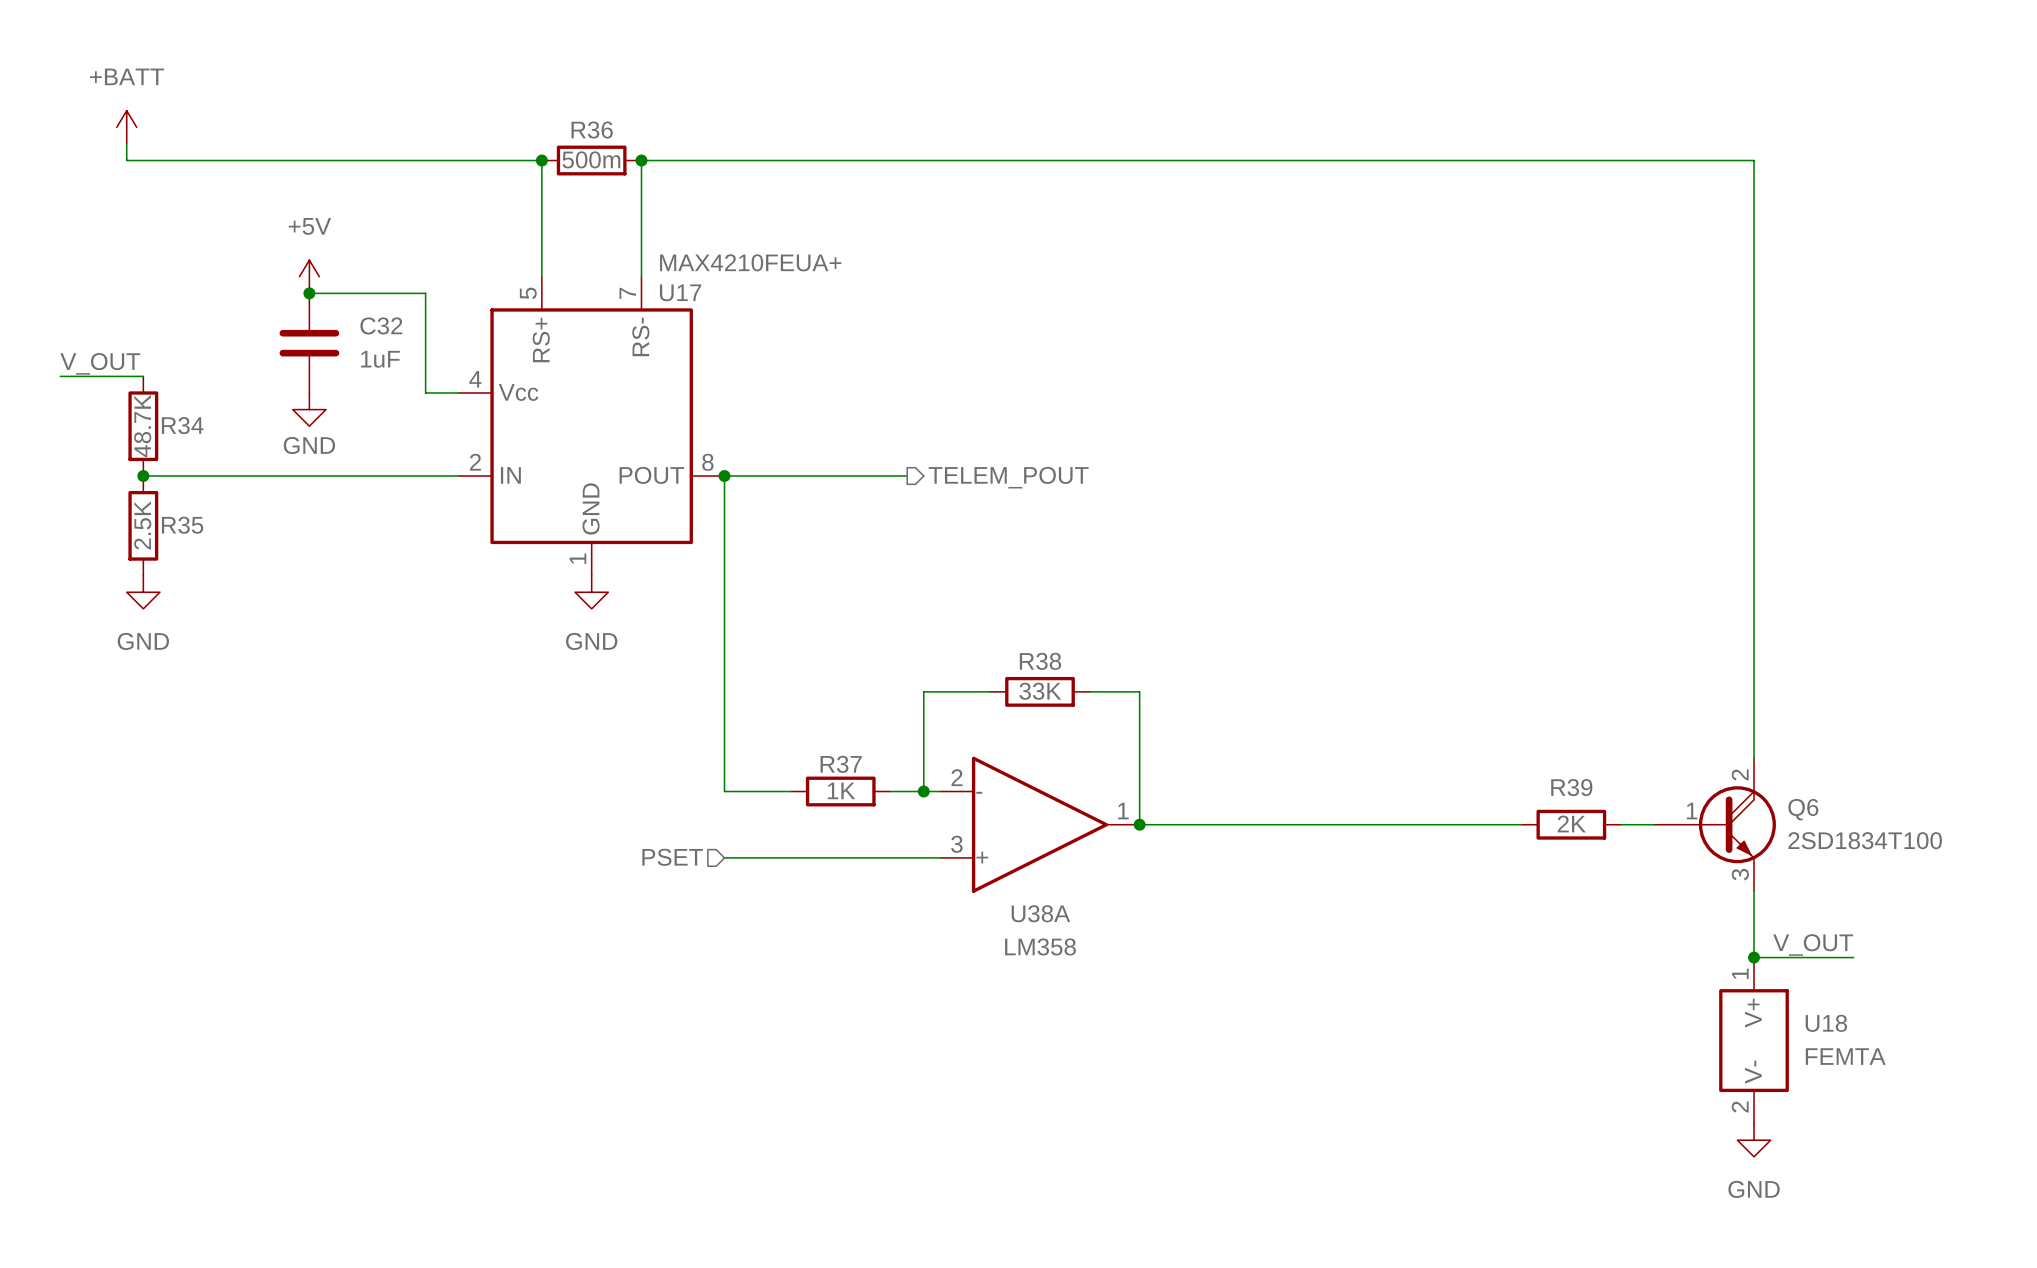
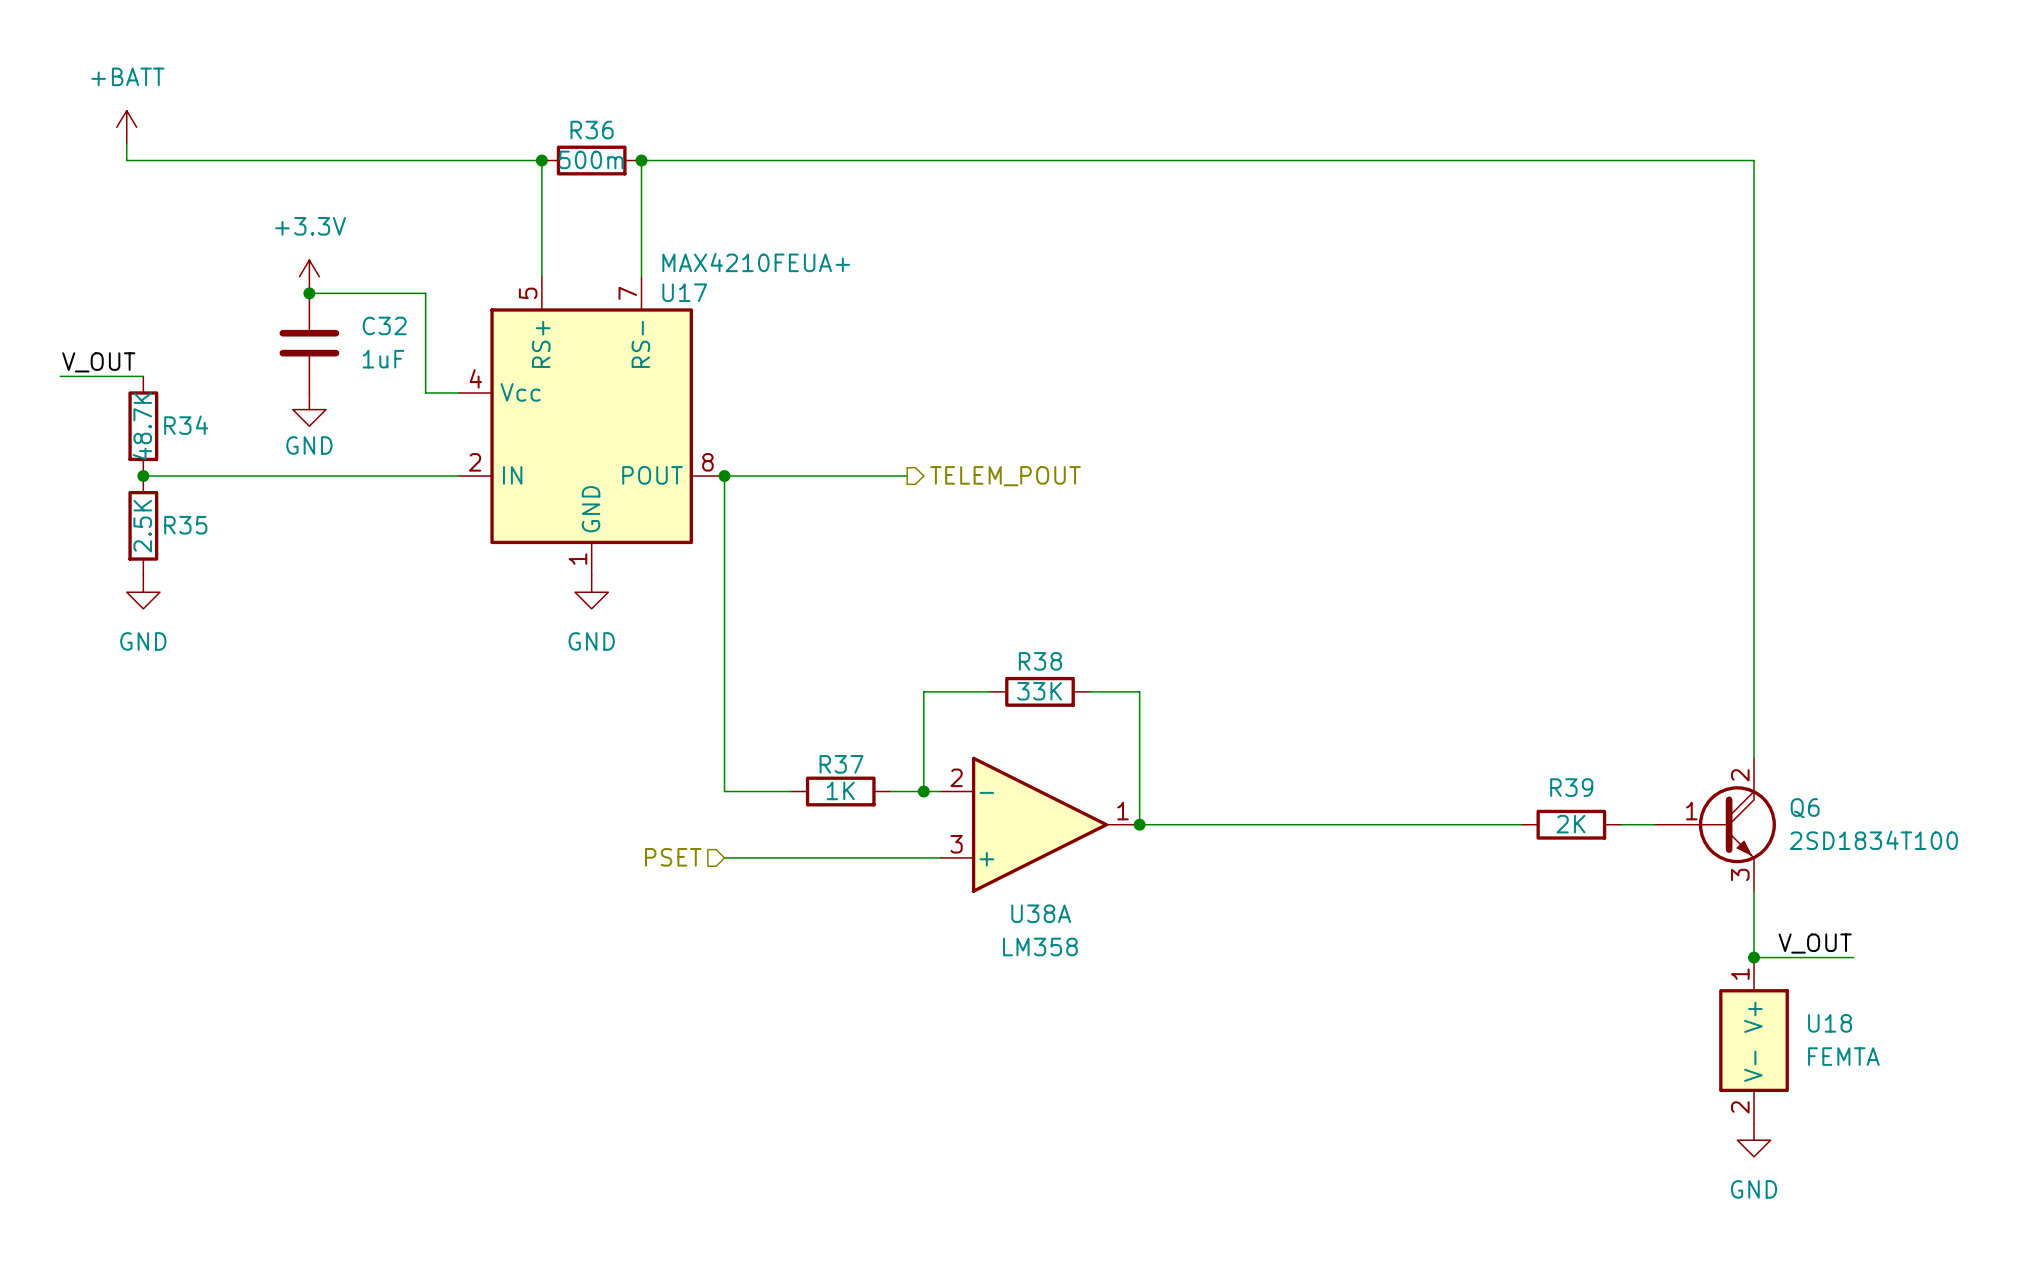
power symbol: +5V (309, 276) -> +3.3V (309, 276)

